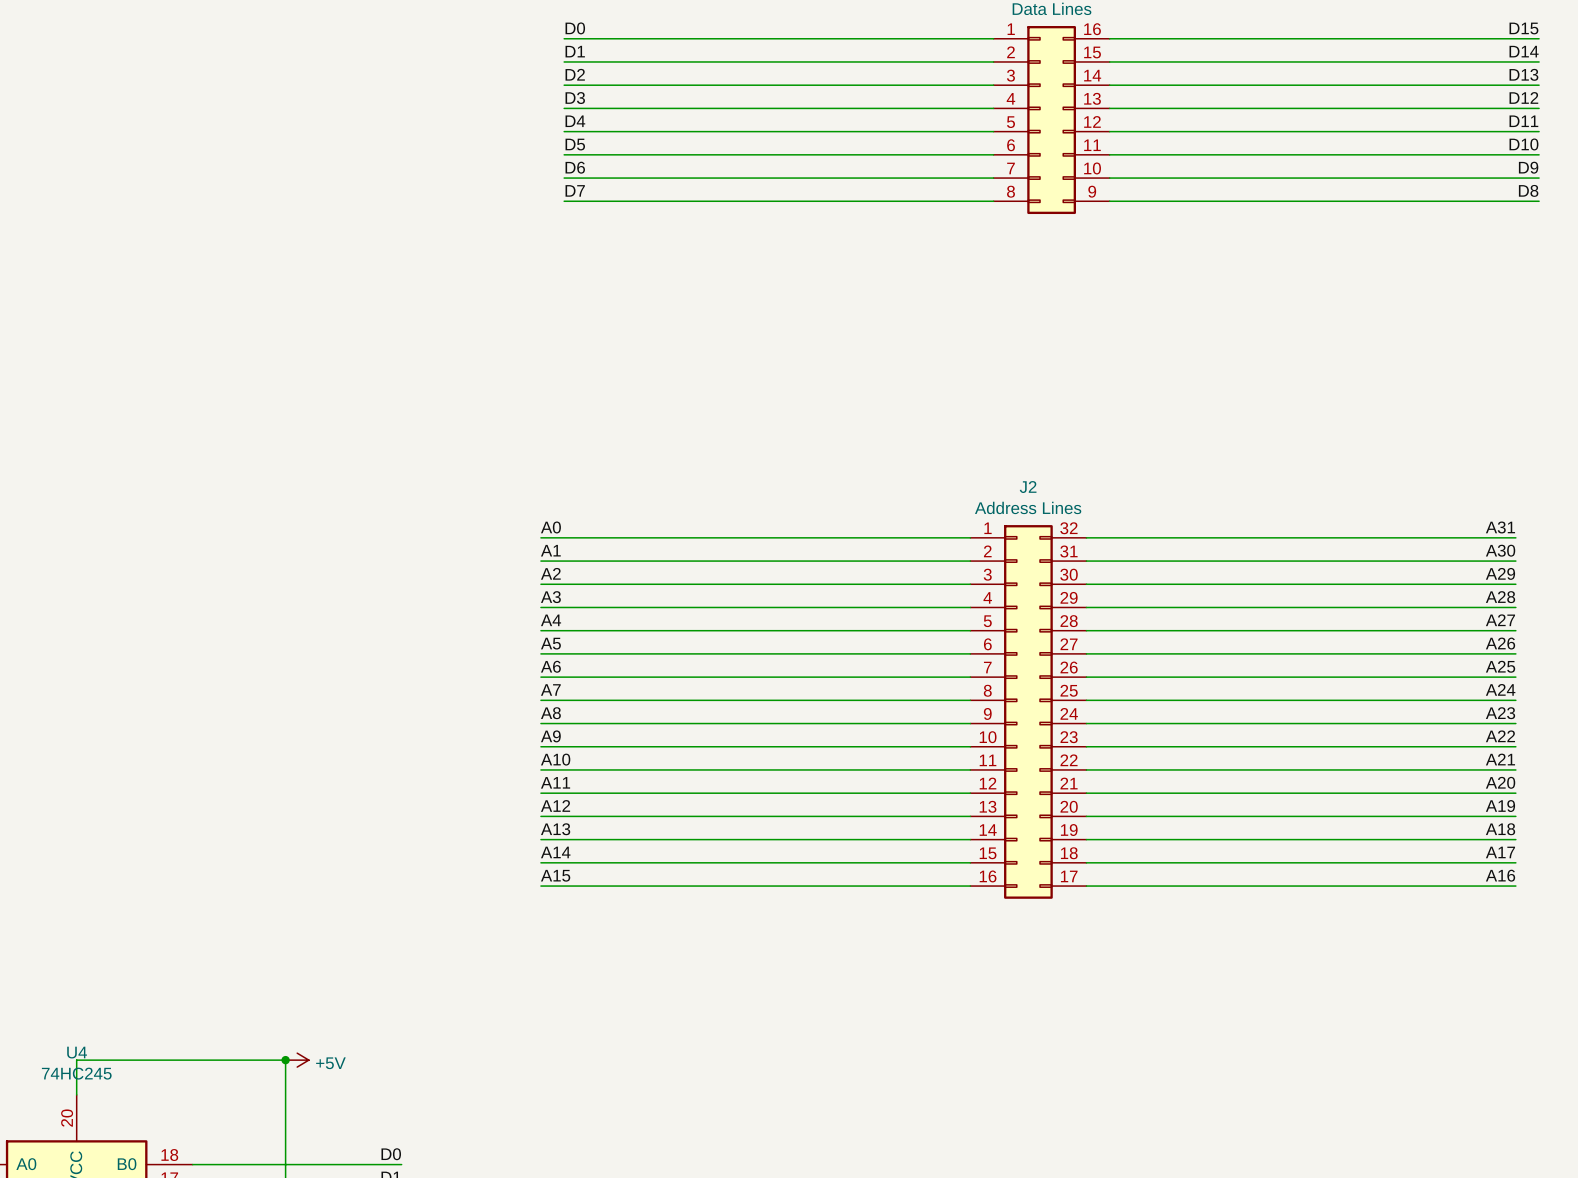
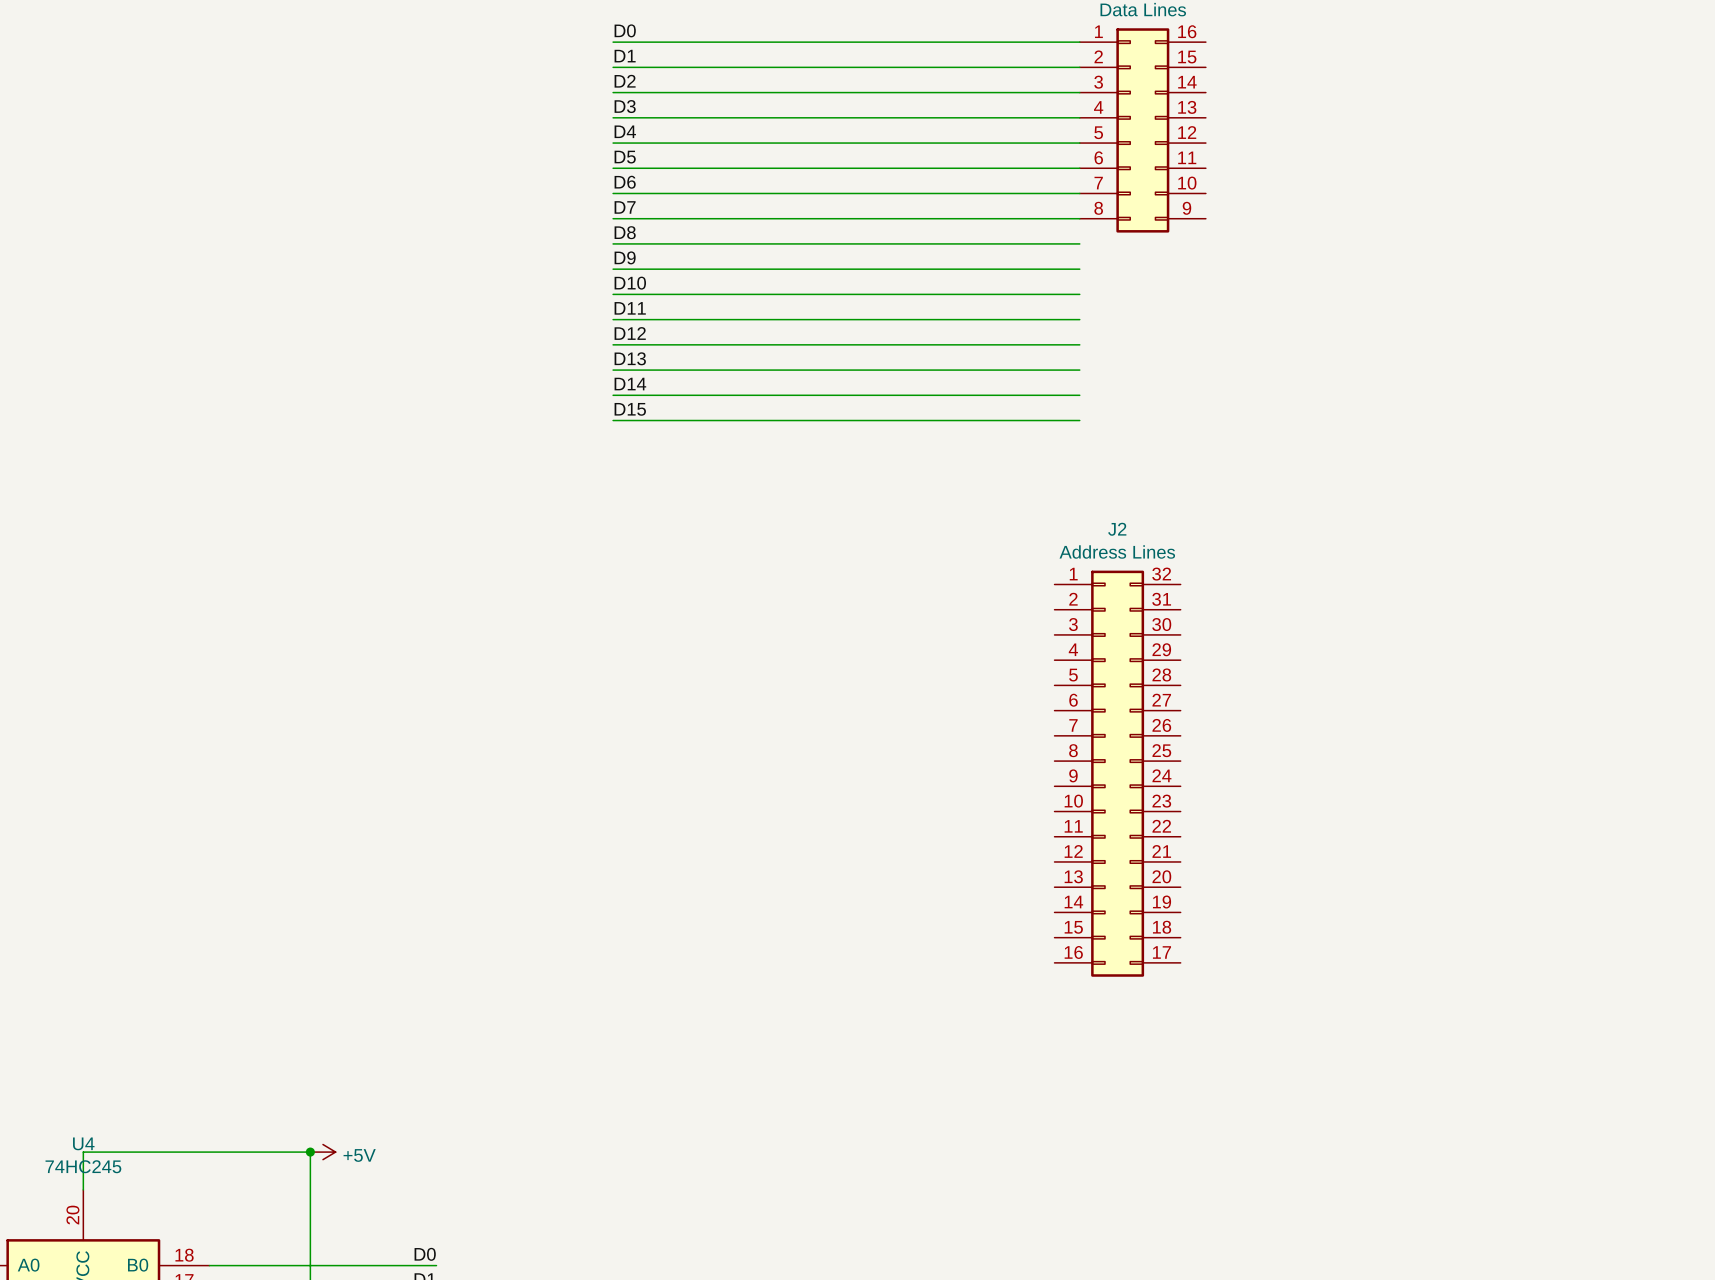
label: D15 (1523, 28) -> none
wire: (1109, 38) (1539, 38) -> none
label: D14 (1524, 51) -> none
wire: (1109, 61) (1539, 61) -> none
label: D13 (1523, 74) -> none
wire: (1109, 85) (1539, 85) -> none
label: D12 (1523, 97) -> none
wire: (1109, 108) (1539, 108) -> none
label: D11 (1523, 121) -> none
wire: (1109, 131) (1539, 131) -> none
label: D10 (1523, 144) -> none
wire: (1109, 154) (1539, 154) -> none
label: D9 (1528, 167) -> none
wire: (1109, 178) (1539, 178) -> none
label: D8 (1528, 190) -> none
wire: (1109, 201) (1539, 201) -> none
label: none -> D8 (625, 232)
wire: none -> (613, 243) (1079, 243)
label: none -> D9 (625, 257)
wire: none -> (613, 269) (1079, 269)
label: none -> D10 (630, 283)
wire: none -> (613, 294) (1079, 294)
label: none -> D11 (630, 308)
wire: none -> (613, 319) (1079, 319)
label: none -> D12 (630, 333)
label: none -> D13 (630, 358)
label: none -> D14 (630, 384)
label: none -> D15 (630, 409)
label: A0 (550, 527) -> none
label: A31 (1500, 527) -> none
wire: (540, 537) (970, 537) -> (613, 344) (1079, 344)
wire: (1086, 537) (1515, 537) -> none
label: A1 (550, 550) -> none
label: A30 (1500, 550) -> none
wire: (540, 561) (970, 561) -> (613, 370) (1079, 370)
wire: (1086, 561) (1515, 561) -> none
label: A2 (550, 573) -> none
label: A29 (1500, 573) -> none
wire: (540, 584) (970, 584) -> (613, 395) (1079, 395)
wire: (1086, 584) (1515, 584) -> none
label: A3 (550, 597) -> none
label: A28 (1500, 597) -> none
wire: (540, 607) (970, 607) -> (613, 420) (1079, 420)
wire: (1086, 607) (1515, 607) -> none
label: A4 (551, 620) -> none
label: A27 (1500, 620) -> none
wire: (540, 630) (970, 630) -> none
wire: (1086, 630) (1515, 630) -> none
label: A5 (550, 643) -> none
label: A26 (1500, 643) -> none
wire: (540, 653) (970, 653) -> none
wire: (1086, 653) (1515, 653) -> none
label: A6 (550, 666) -> none
label: A25 (1500, 666) -> none
wire: (540, 677) (970, 677) -> none
wire: (1086, 677) (1515, 677) -> none
label: A7 (550, 689) -> none
label: A24 (1500, 689) -> none
wire: (540, 700) (970, 700) -> none
wire: (1086, 700) (1515, 700) -> none
label: A8 (550, 713) -> none
label: A23 (1500, 713) -> none
wire: (540, 723) (970, 723) -> none
wire: (1086, 723) (1515, 723) -> none
label: A9 (550, 736) -> none
label: A22 (1500, 736) -> none
wire: (540, 746) (970, 746) -> none
wire: (1086, 746) (1515, 746) -> none
label: A10 (555, 759) -> none
label: A21 (1500, 759) -> none
wire: (540, 769) (970, 769) -> none
wire: (1086, 769) (1515, 769) -> none
label: A11 (555, 782) -> none
label: A20 (1500, 782) -> none
wire: (540, 793) (970, 793) -> none
wire: (1086, 793) (1515, 793) -> none
label: A12 (555, 805) -> none
label: A19 (1500, 806) -> none
wire: (540, 816) (970, 816) -> none
wire: (1086, 816) (1515, 816) -> none
label: A13 (555, 829) -> none
label: A18 (1500, 829) -> none
wire: (540, 839) (970, 839) -> none
wire: (1086, 839) (1515, 839) -> none
label: A14 (555, 852) -> none
label: A17 (1500, 852) -> none
wire: (540, 862) (970, 862) -> none
wire: (1086, 862) (1515, 862) -> none
label: A15 (555, 875) -> none
label: A16 (1500, 875) -> none
wire: (540, 886) (970, 886) -> none
wire: (1086, 886) (1515, 886) -> none

